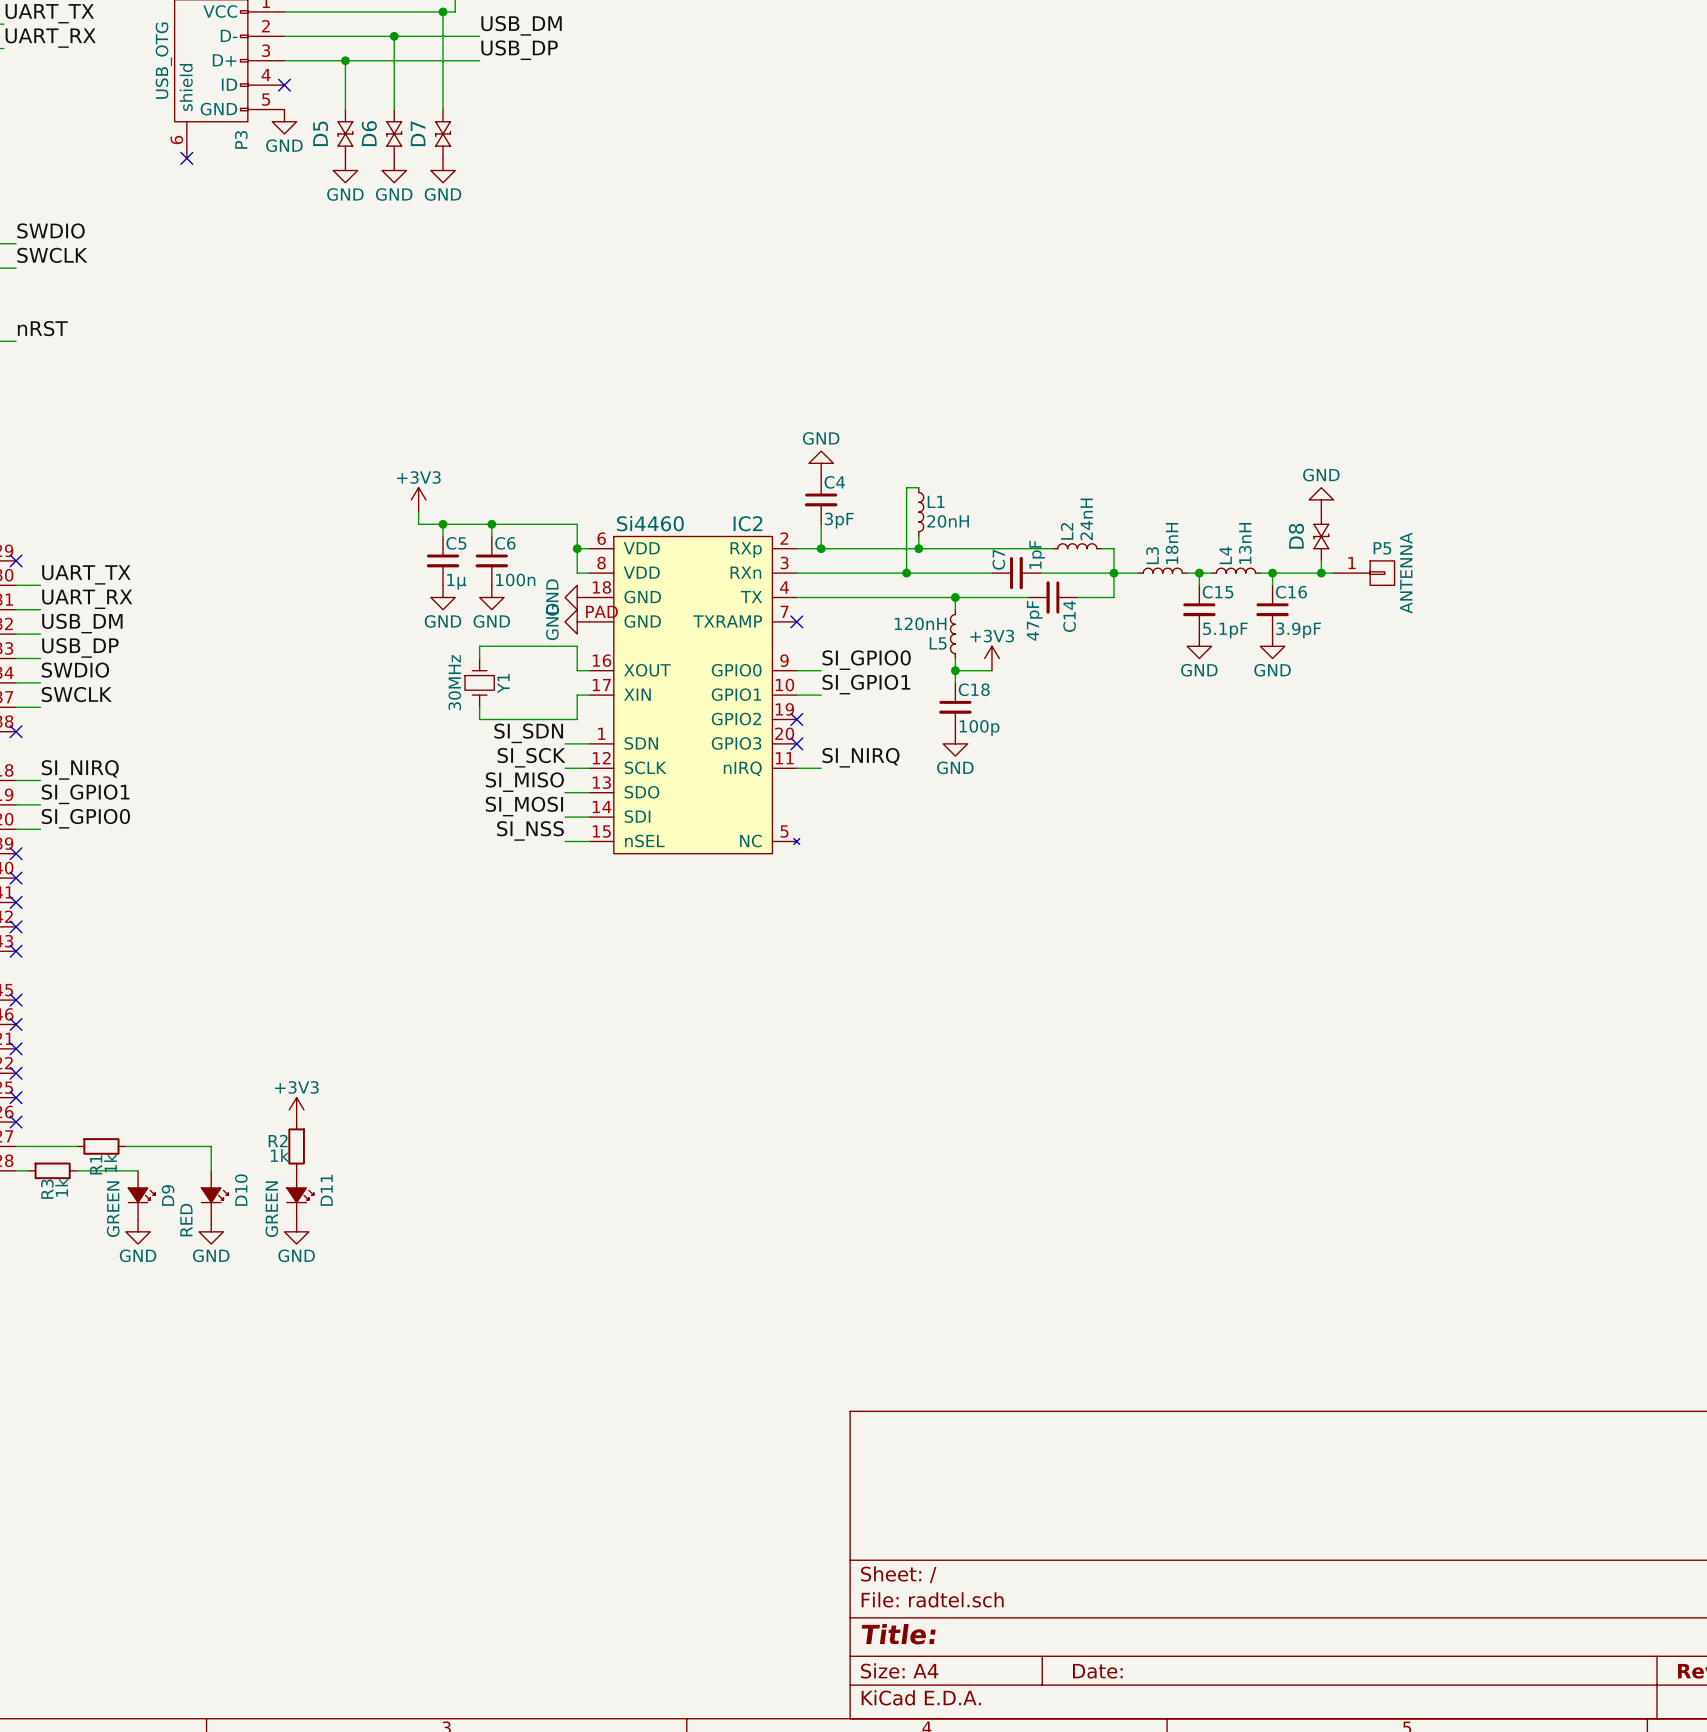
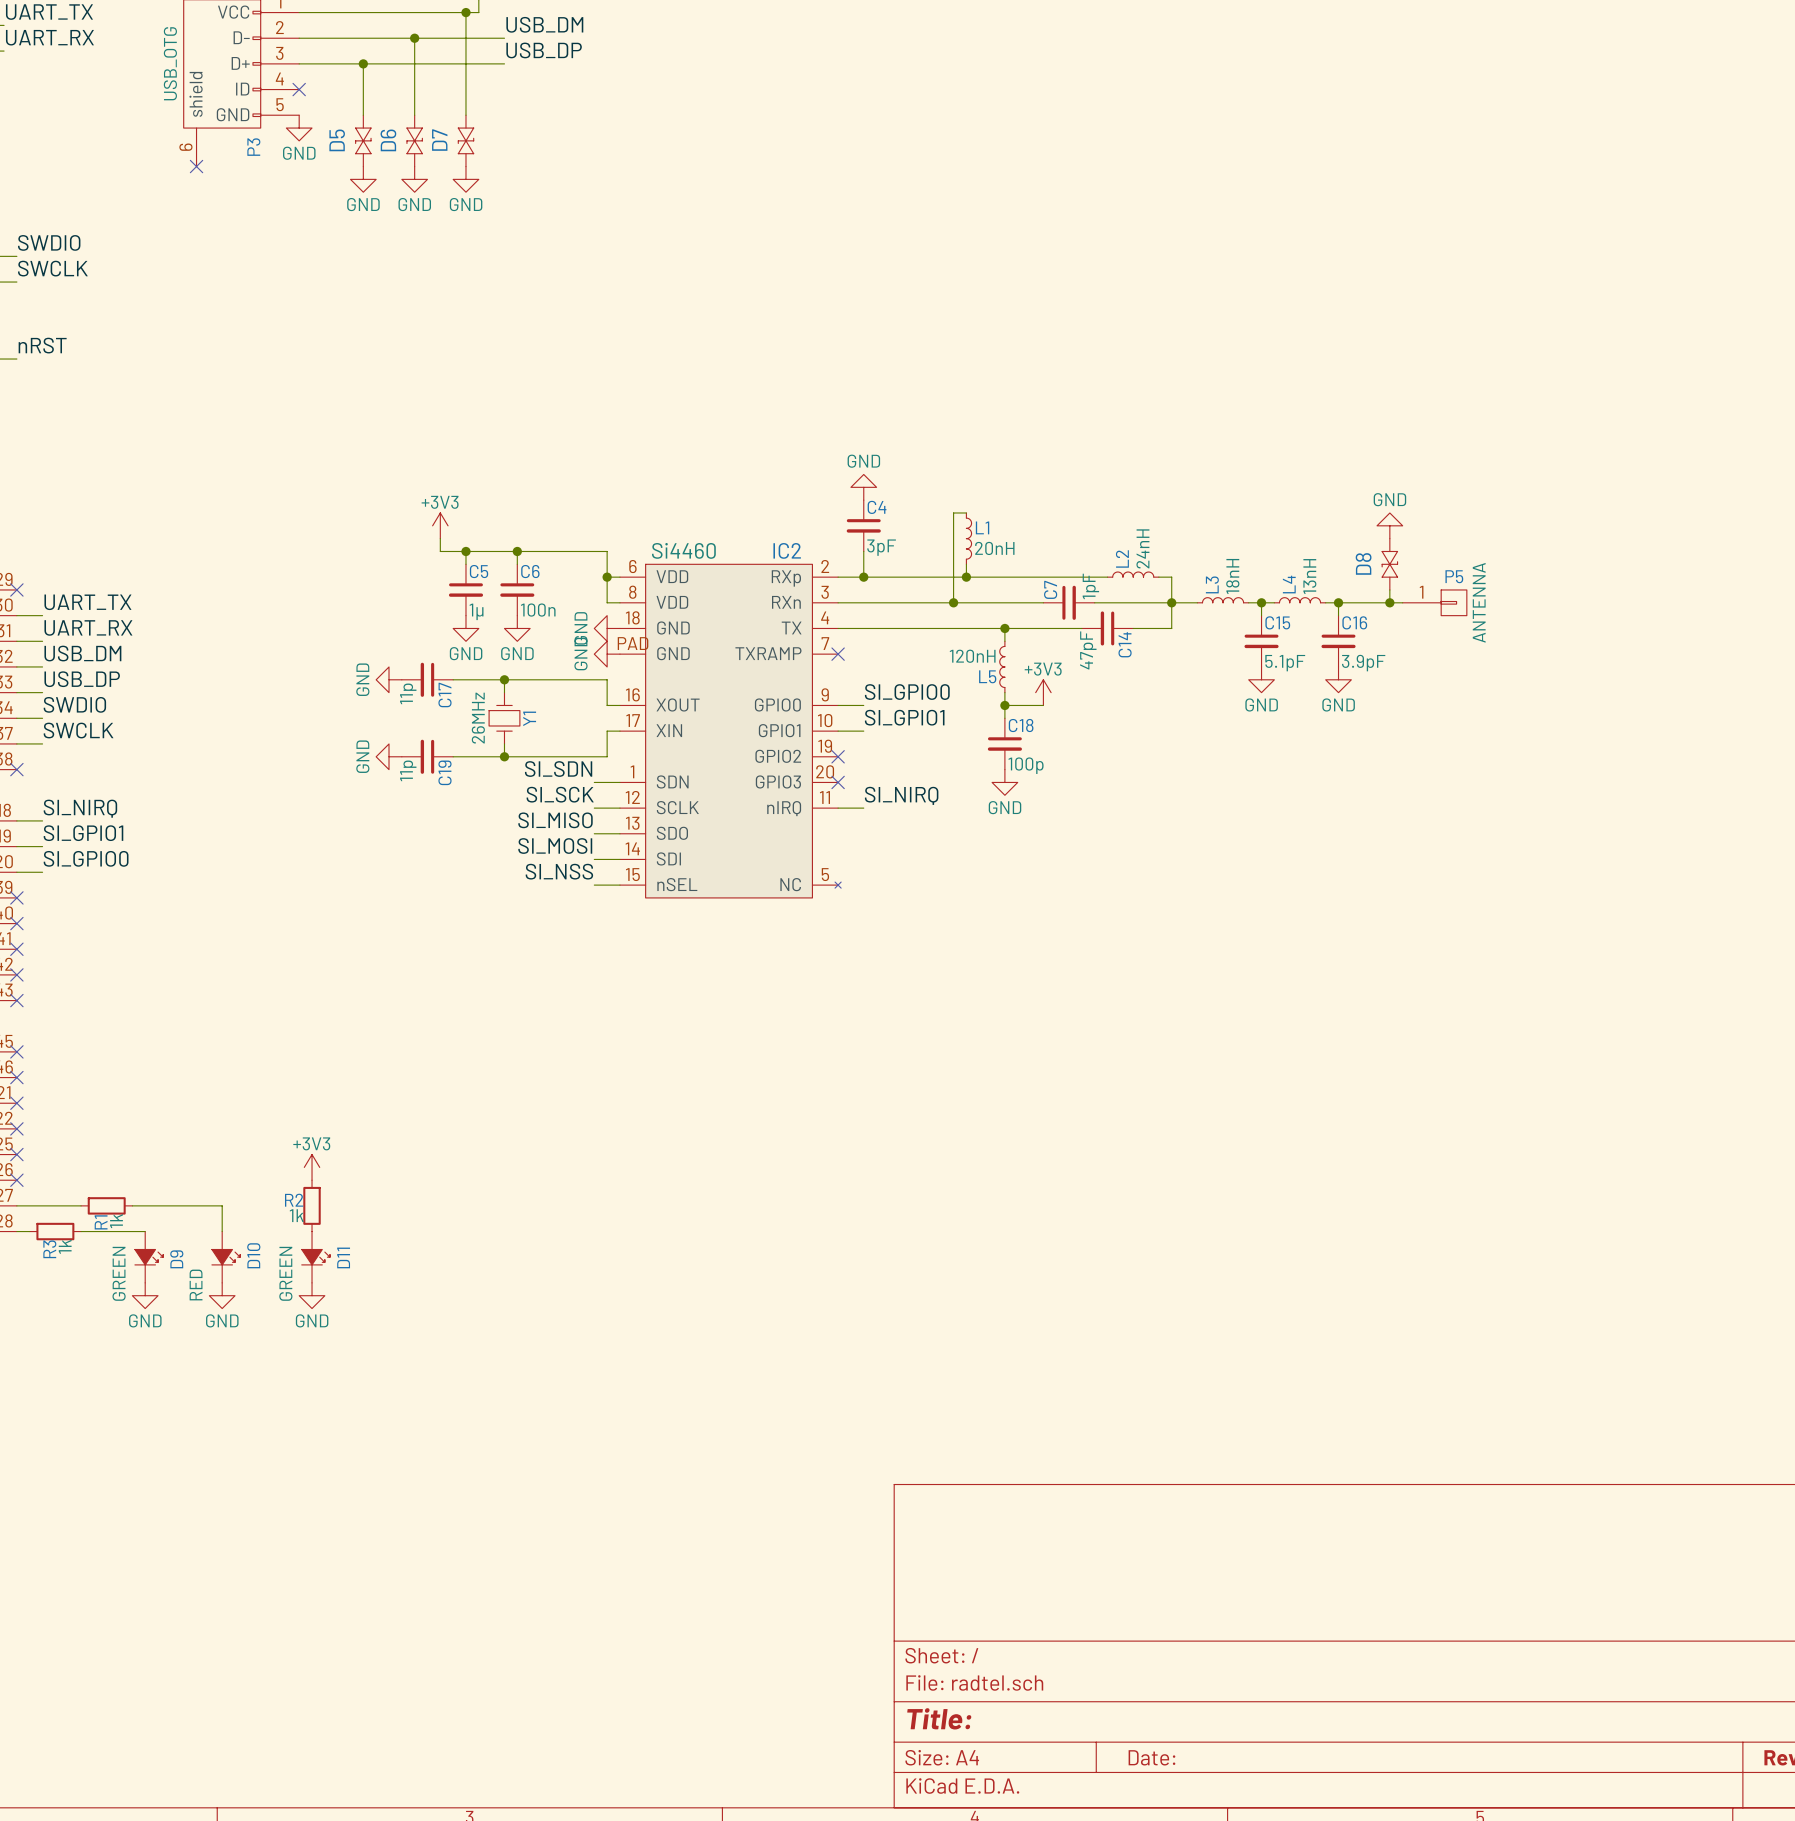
power symbol: none -> GND (389, 679)
C17: none -> 11p (427, 679)
wire: none -> (453, 679) (504, 679)
junction: none -> (504, 679)
Y1 value: 30MHz (454, 682) -> 26MHz (478, 718)
power symbol: none -> GND (389, 756)
C19: none -> 11p (427, 756)
wire: none -> (453, 756) (504, 756)
junction: none -> (504, 756)

